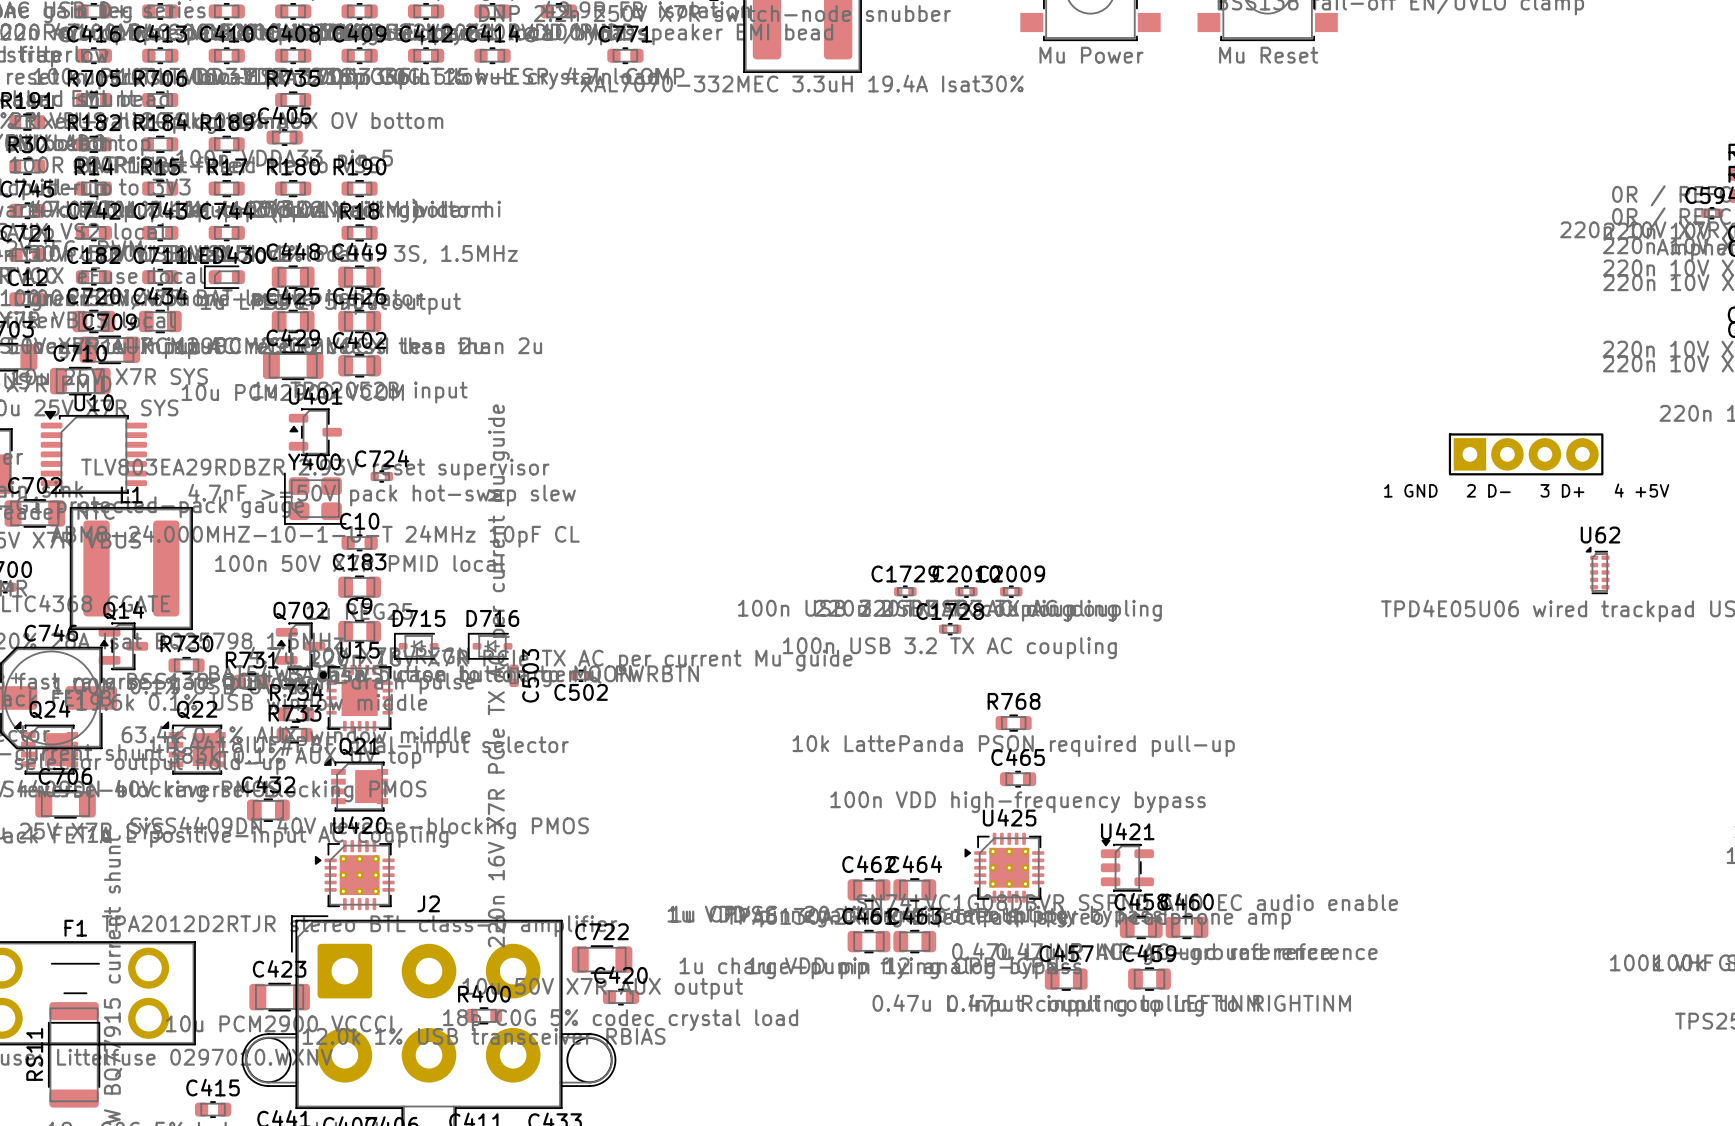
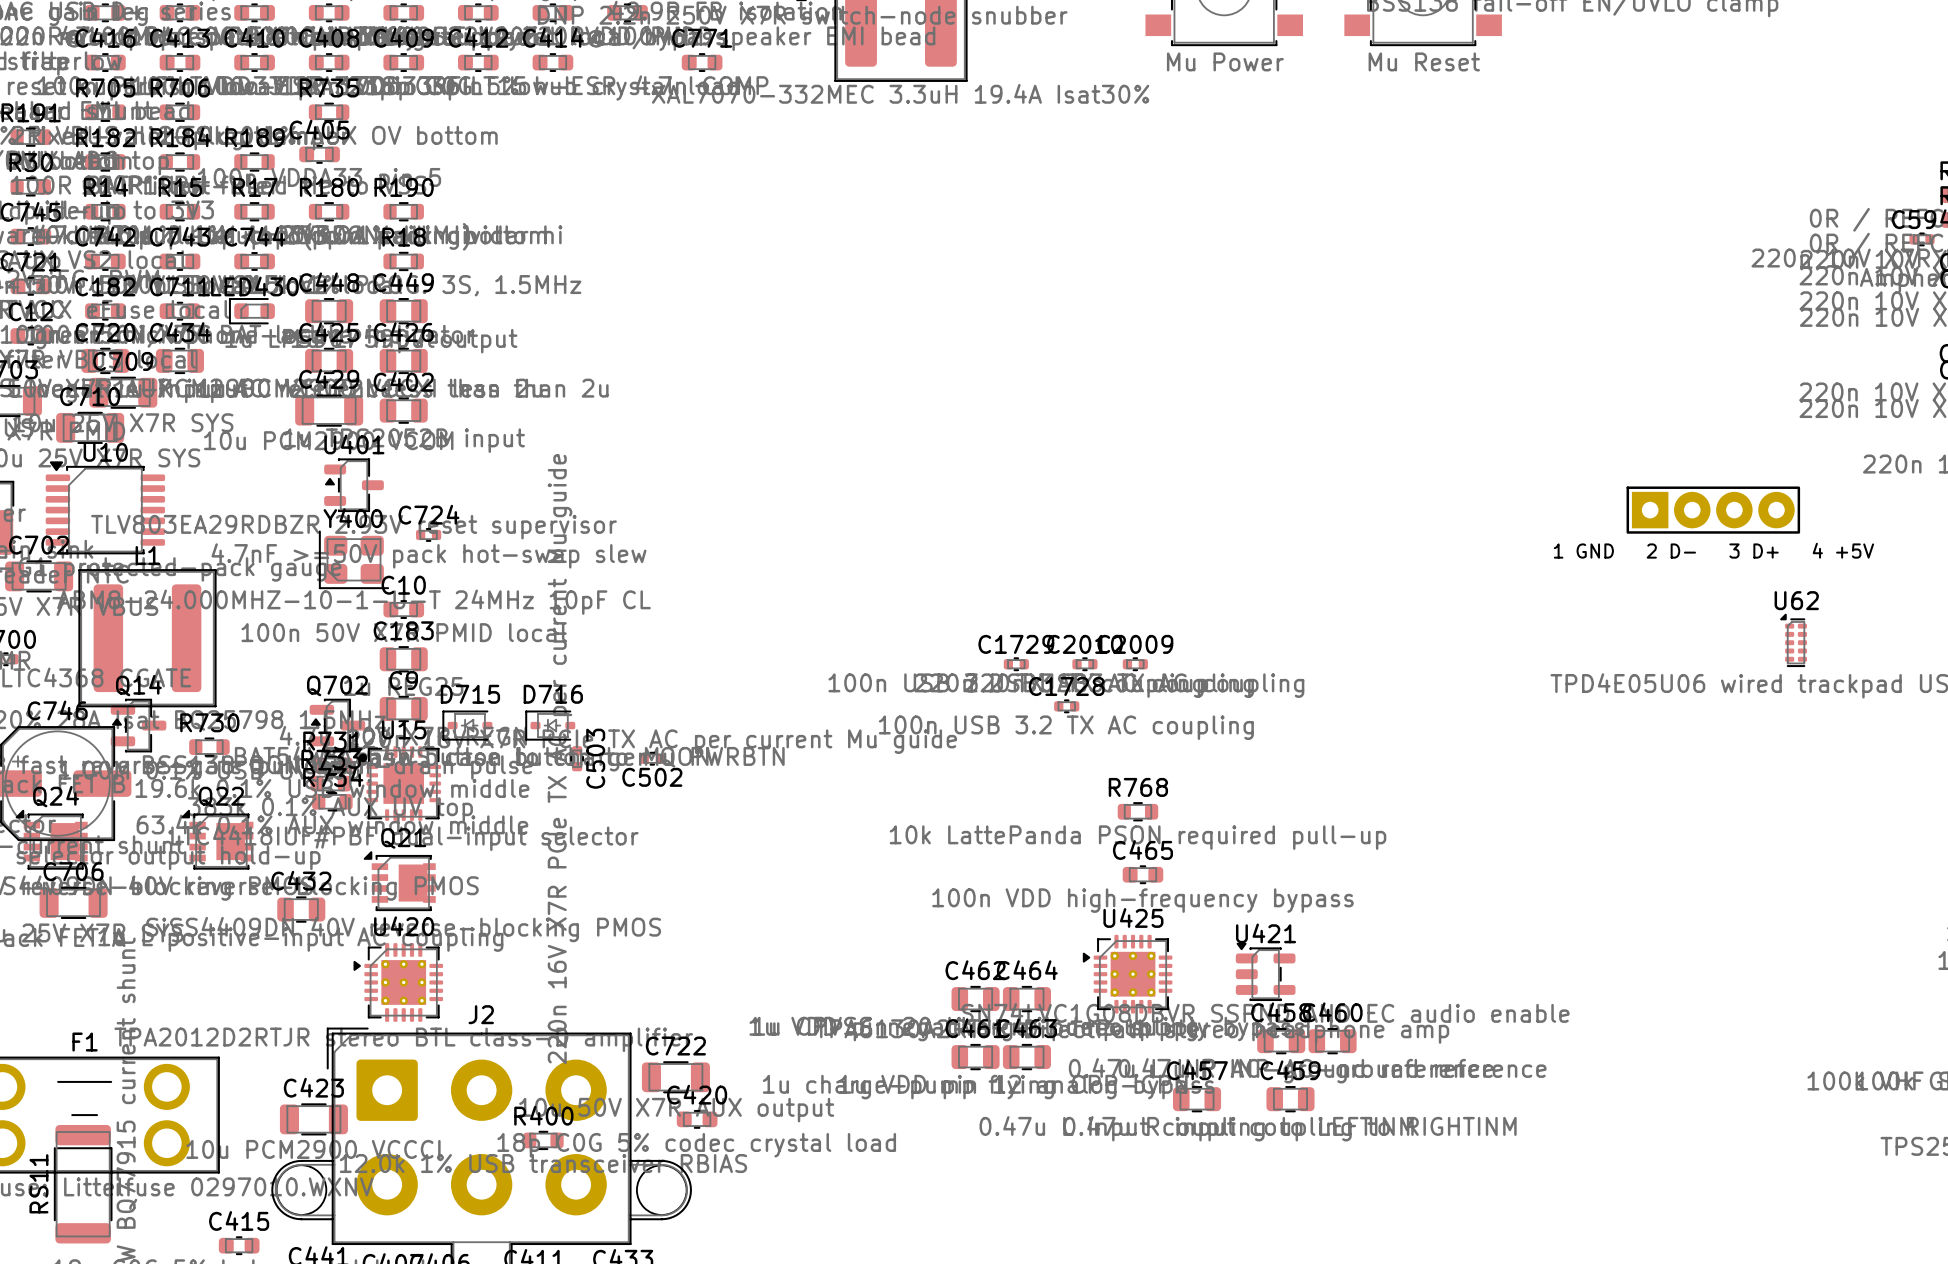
R731 position: (251, 681) -> (332, 765)
R733 position: (294, 734) -> (330, 783)

